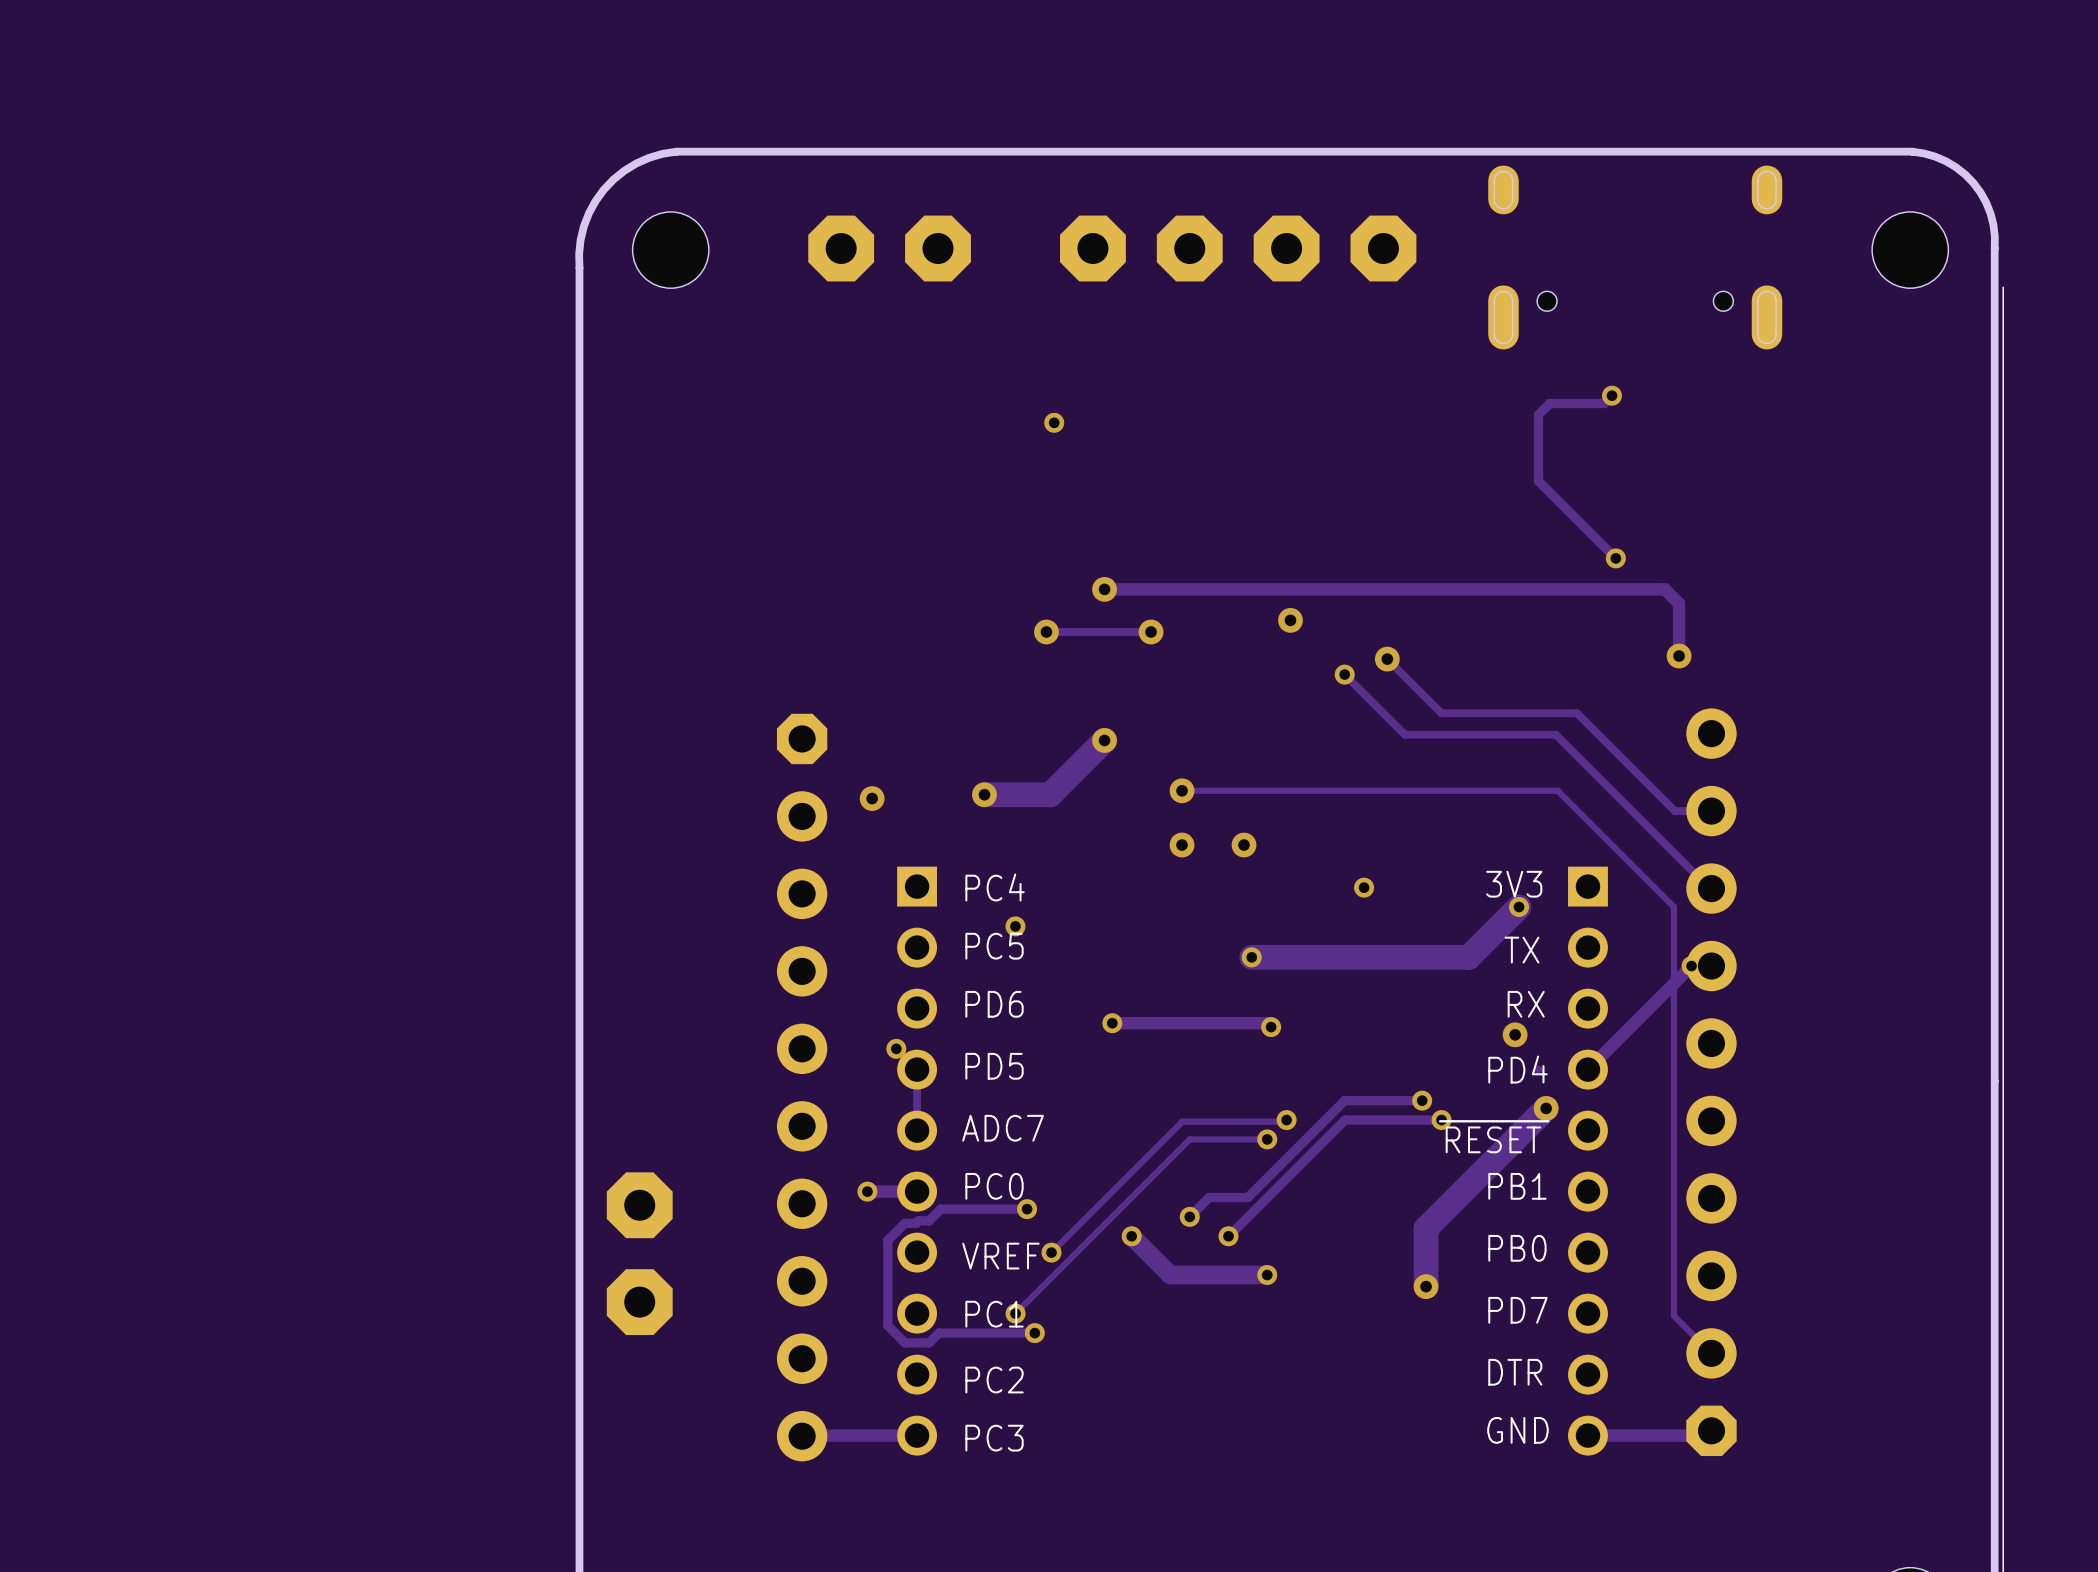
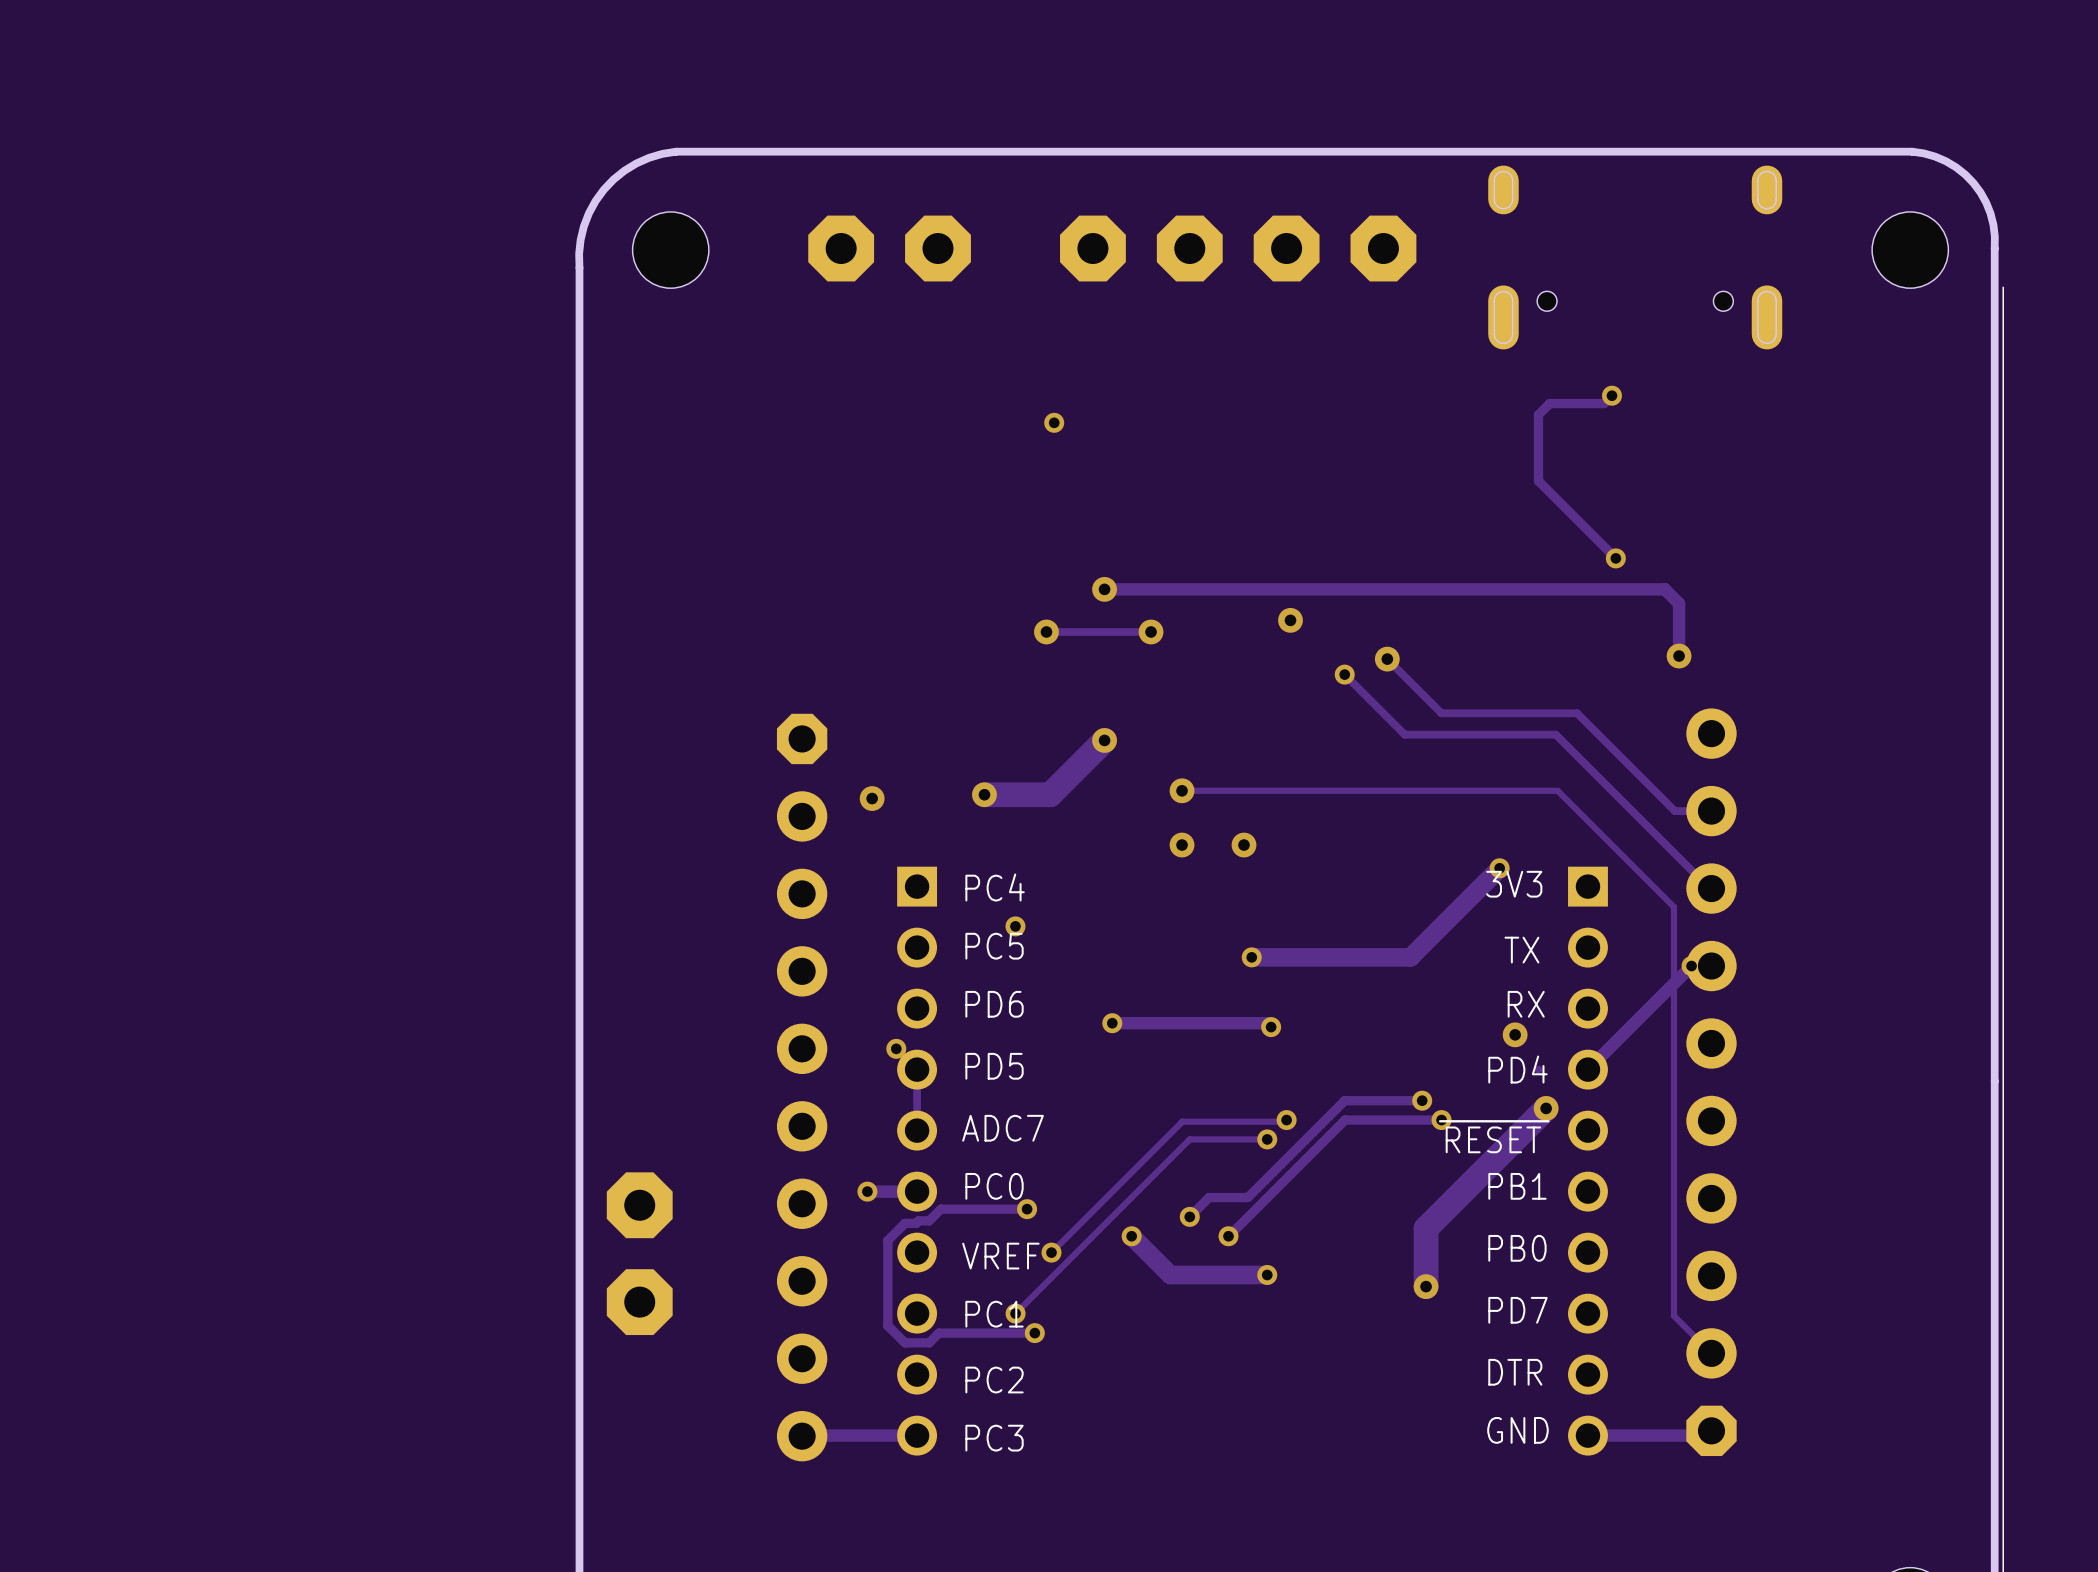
via: (1364, 887) -> none
track: (1519, 907) (1468, 957) (1410, 957) -> (1499, 868) (1410, 957)
via position: (1519, 907) -> (1499, 868)
track width: thick (1251, 957) (1410, 957) -> thin (1251, 957) (1410, 957)

